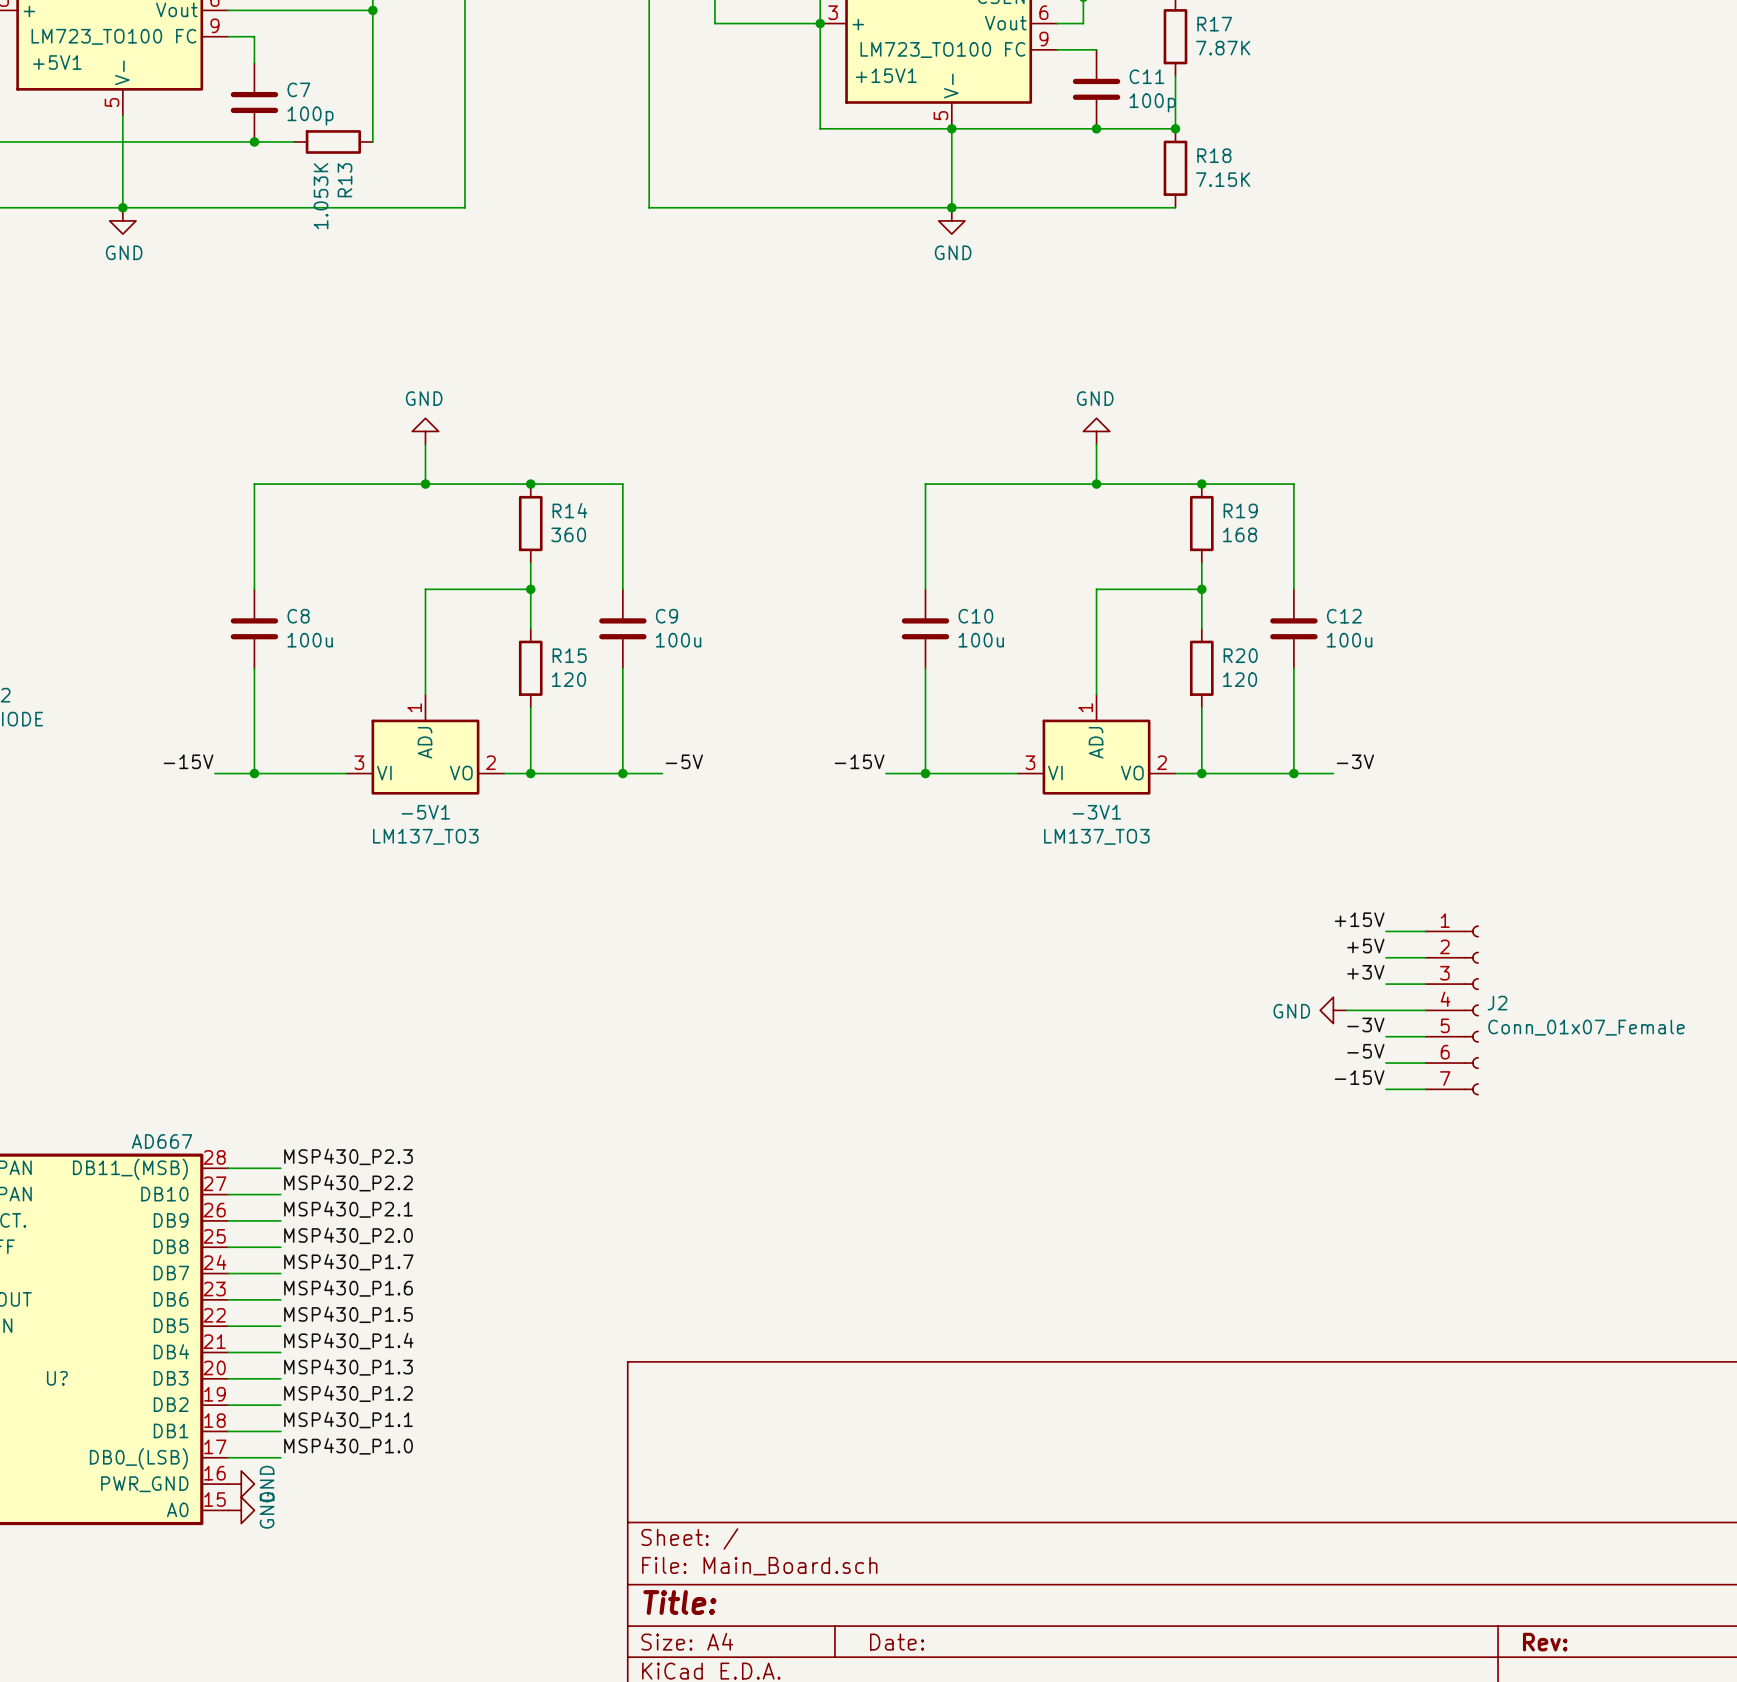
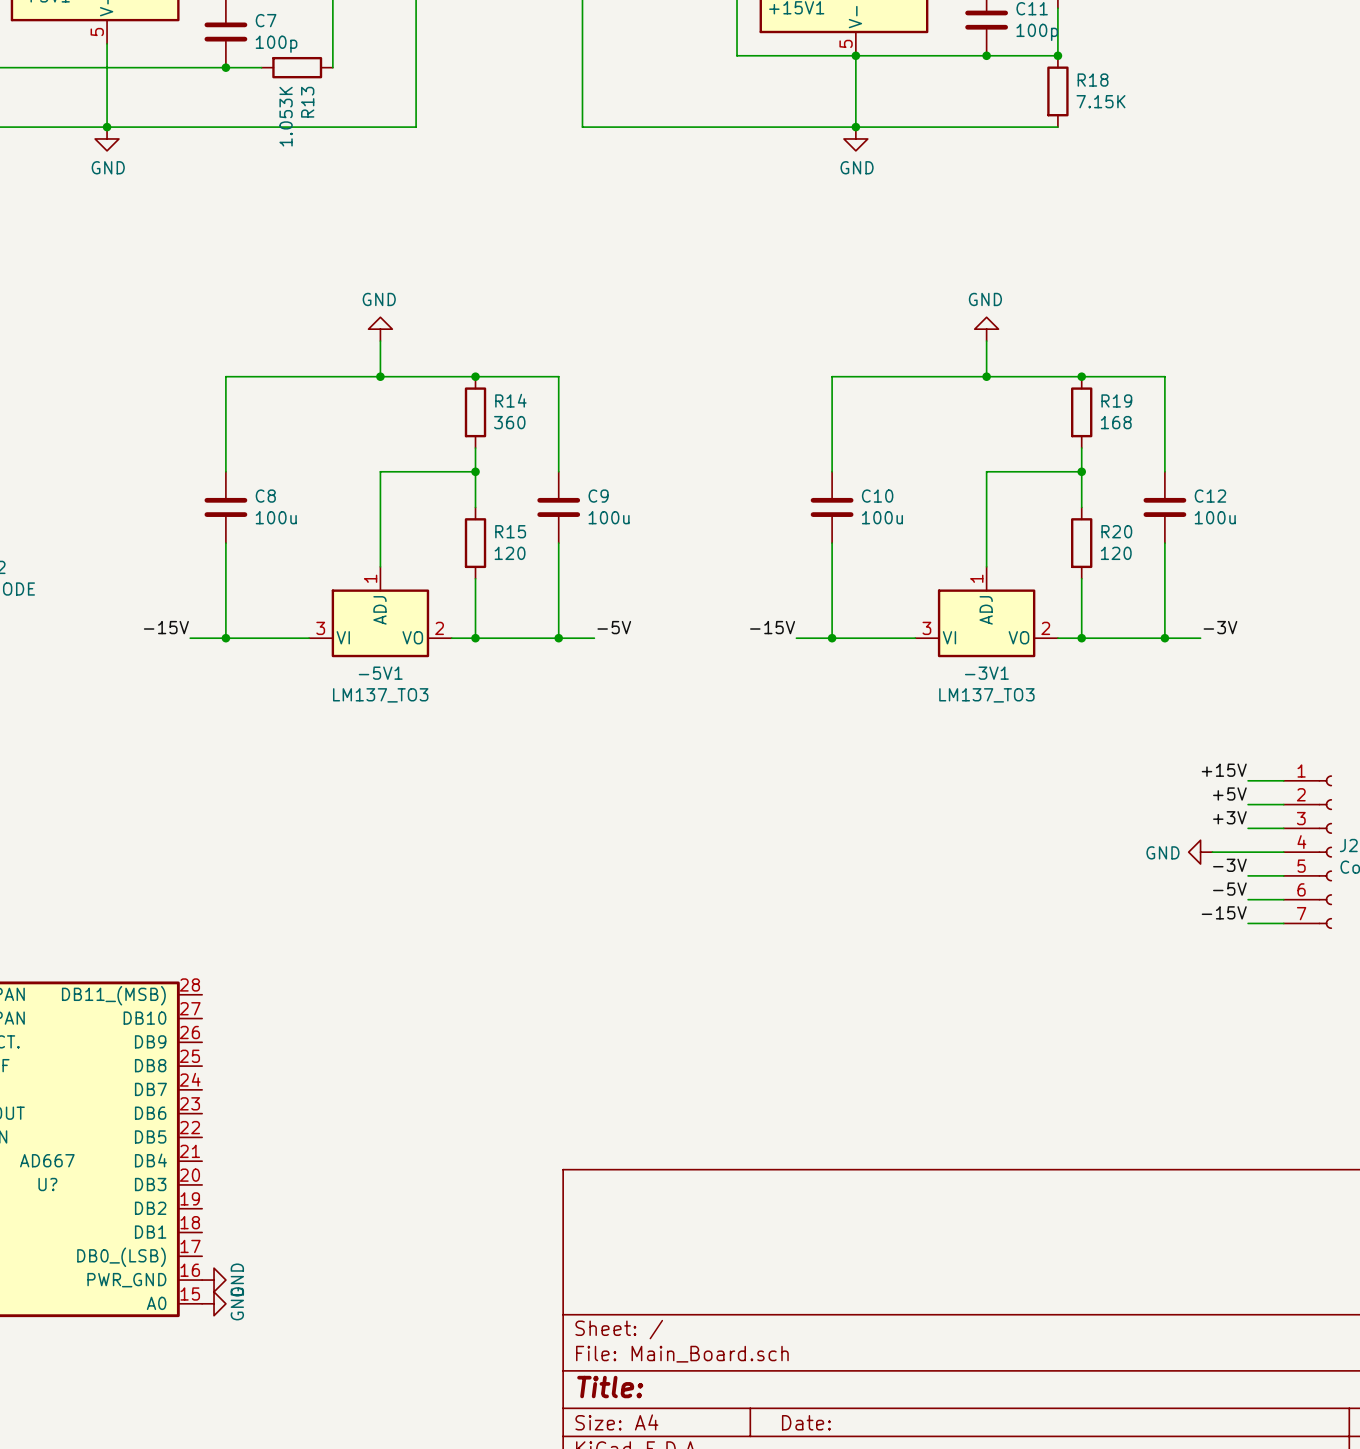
U? value position: AD667 (162, 1141) -> AD667 (47, 1160)
label: MSP430_P2.3 (348, 1156) -> none
wire: (228, 1168) (280, 1168) -> none
label: MSP430_P2.2 (348, 1183) -> none
wire: (228, 1194) (280, 1194) -> none
label: MSP430_P2.1 (348, 1209) -> none
wire: (228, 1220) (280, 1220) -> none
label: MSP430_P2.0 (348, 1235) -> none
wire: (228, 1247) (280, 1247) -> none
label: MSP430_P1.7 (348, 1262) -> none
wire: (228, 1273) (280, 1273) -> none
label: MSP430_P1.6 (348, 1288) -> none
wire: (228, 1299) (280, 1299) -> none
label: MSP430_P1.5 (348, 1314) -> none
wire: (228, 1326) (280, 1326) -> none
label: MSP430_P1.4 (348, 1341) -> none
wire: (228, 1352) (280, 1352) -> none
label: MSP430_P1.3 (348, 1367) -> none
wire: (228, 1378) (280, 1378) -> none
label: MSP430_P1.2 (348, 1393) -> none
wire: (228, 1405) (280, 1405) -> none
label: MSP430_P1.1 (348, 1420) -> none
wire: (228, 1431) (280, 1431) -> none
label: MSP430_P1.0 (348, 1446) -> none
wire: (228, 1457) (280, 1457) -> none

